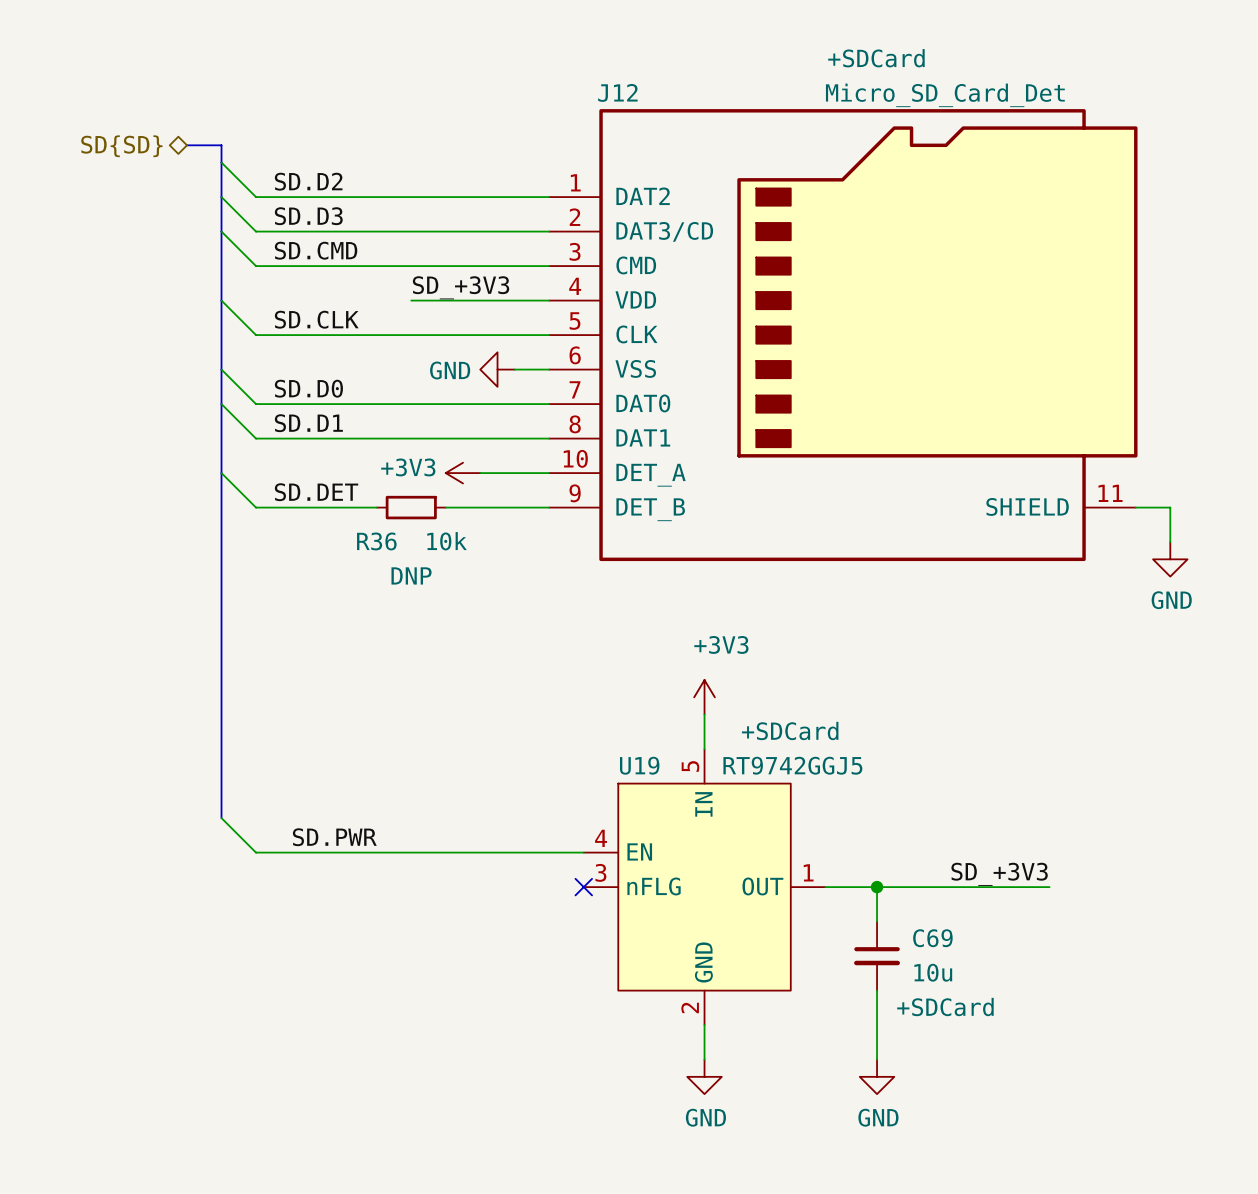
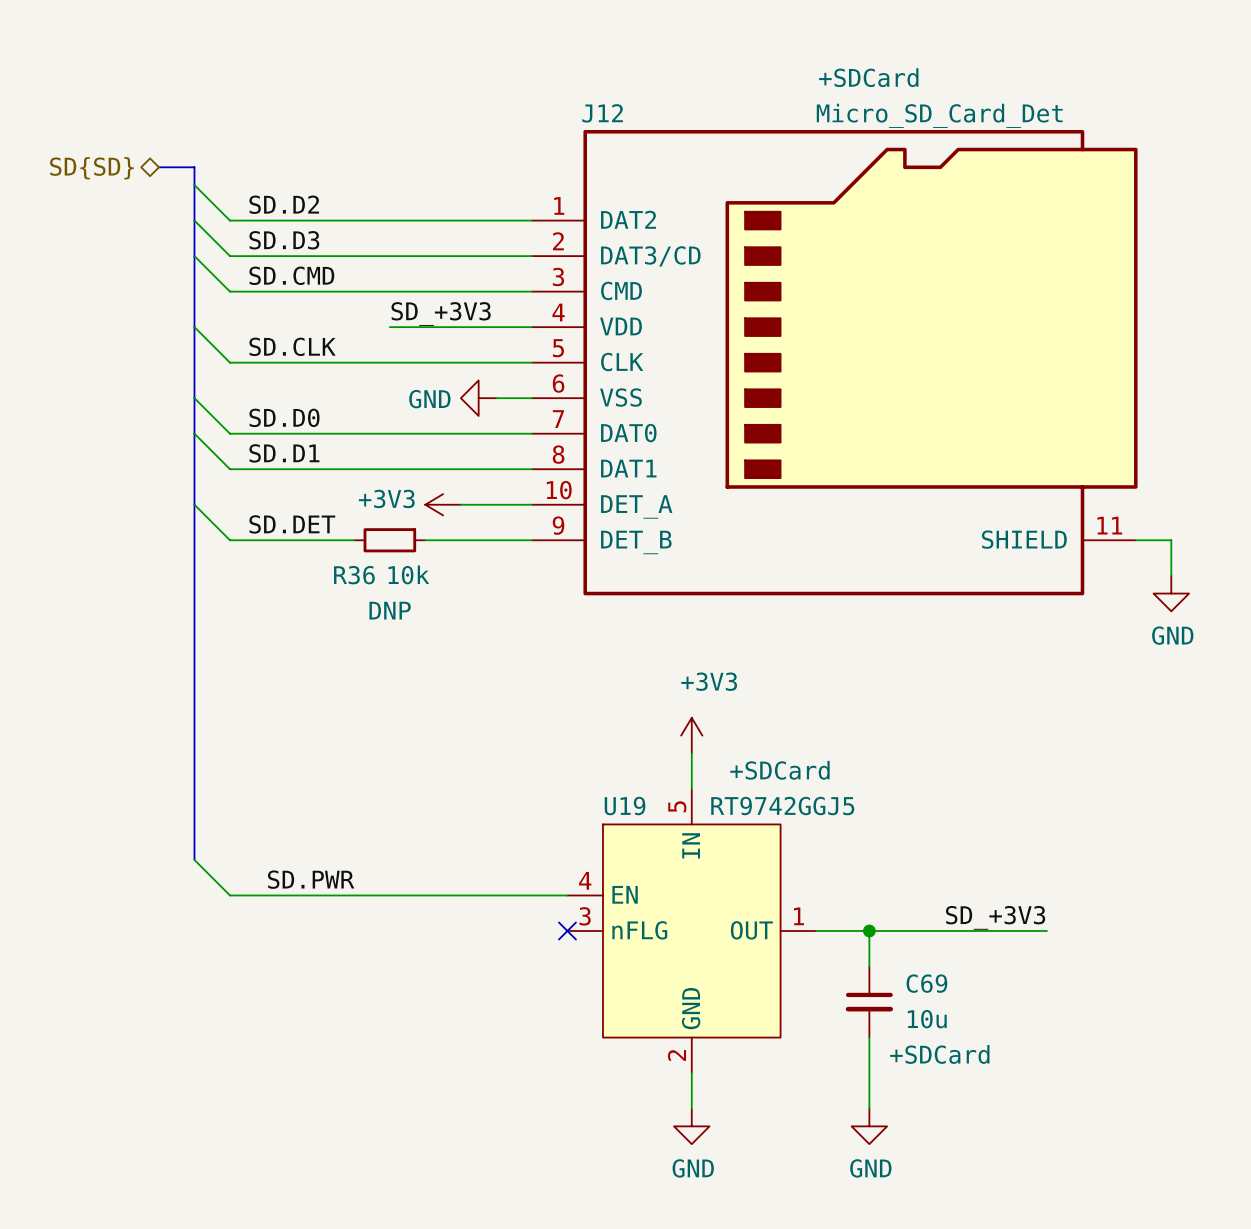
R36 value position: 10k (447, 541) -> 10k (408, 574)

